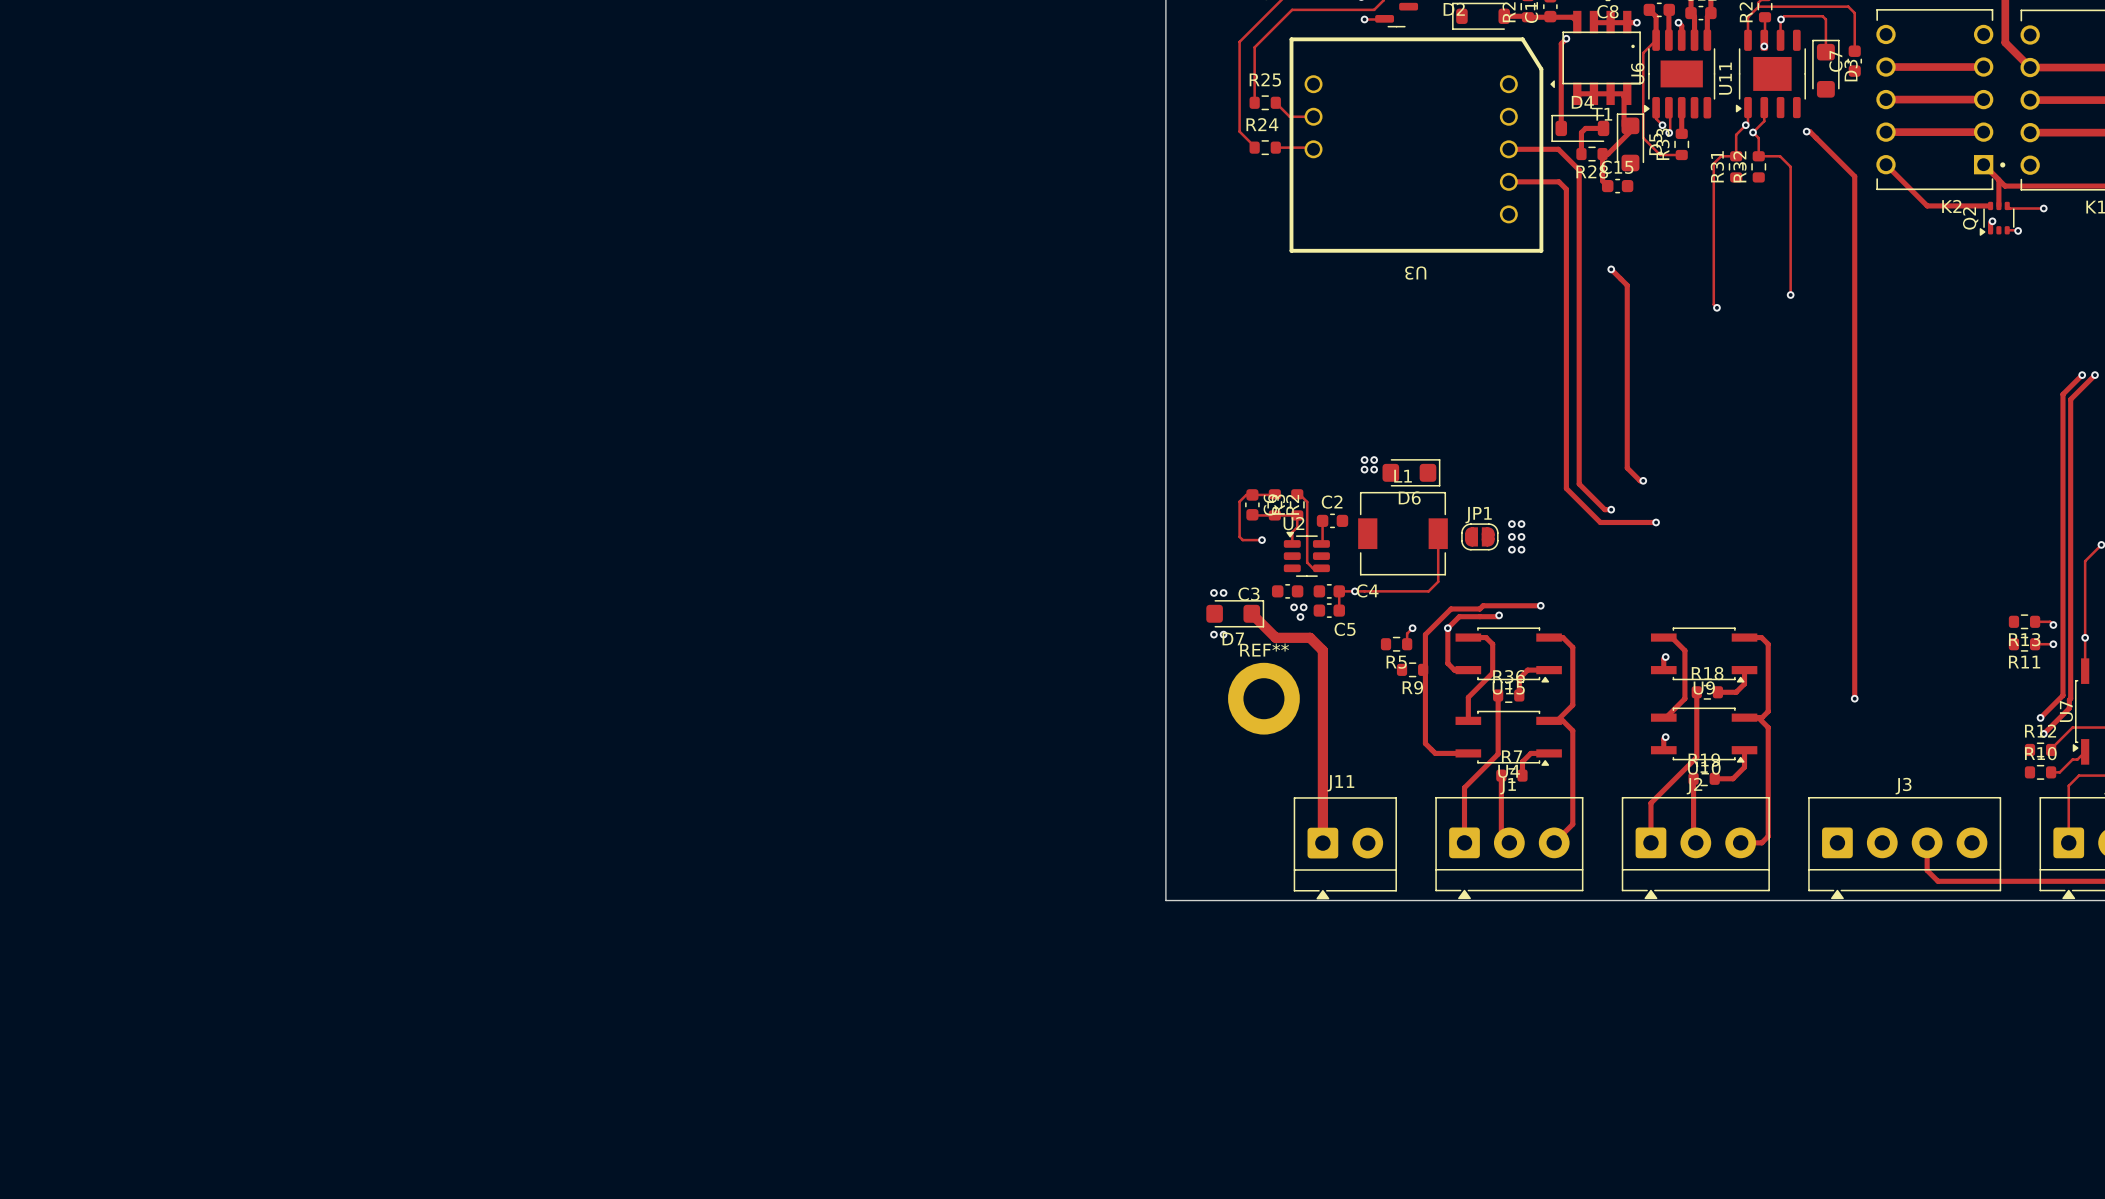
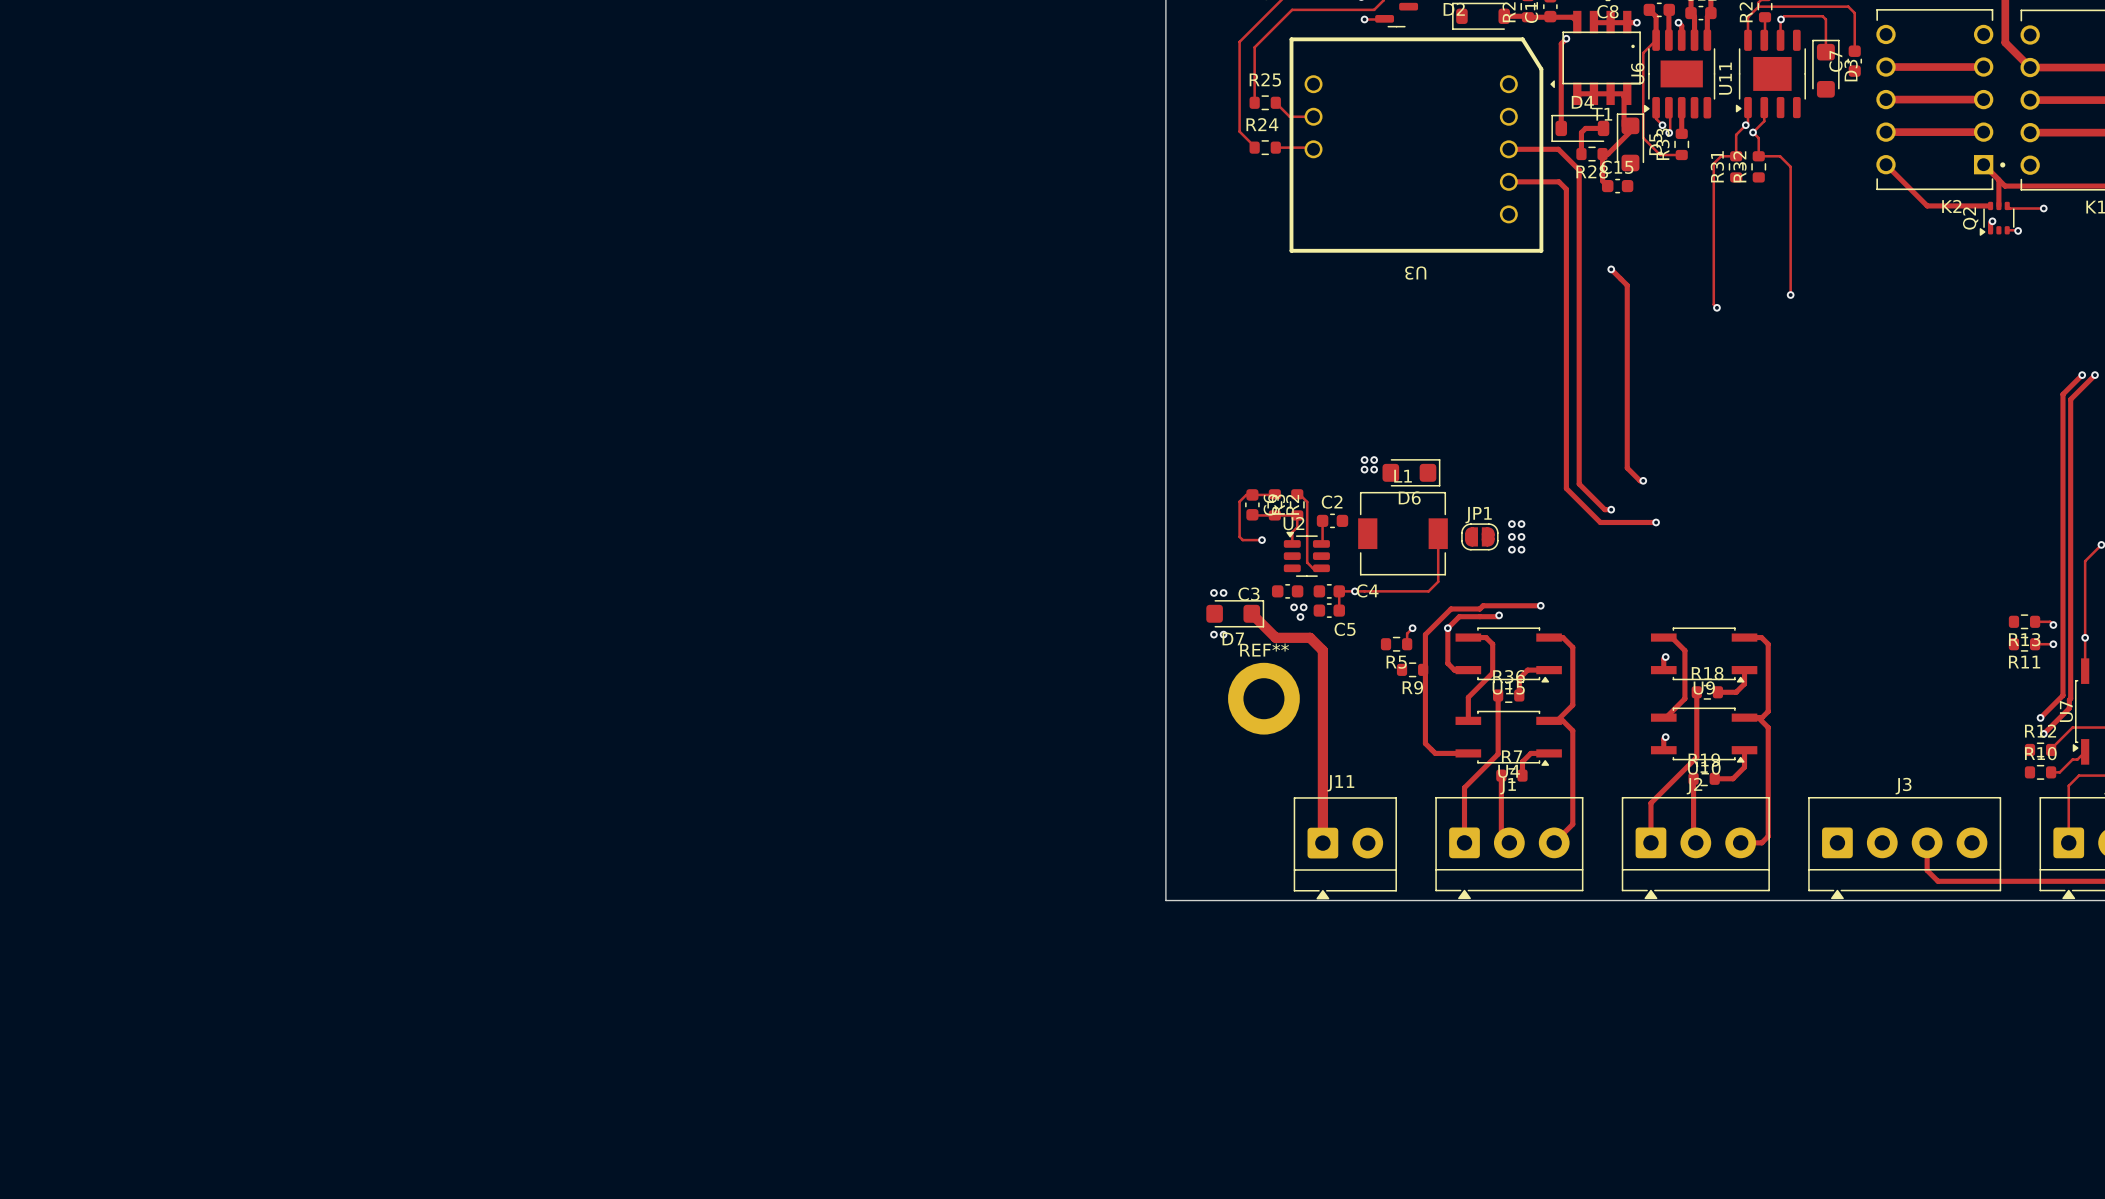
via: (1764, 46) -> none
track: (1806, 131) (1809, 131) (1854, 176) (1854, 698) -> none
via: (1806, 131) -> none
via: (1854, 698) -> none

